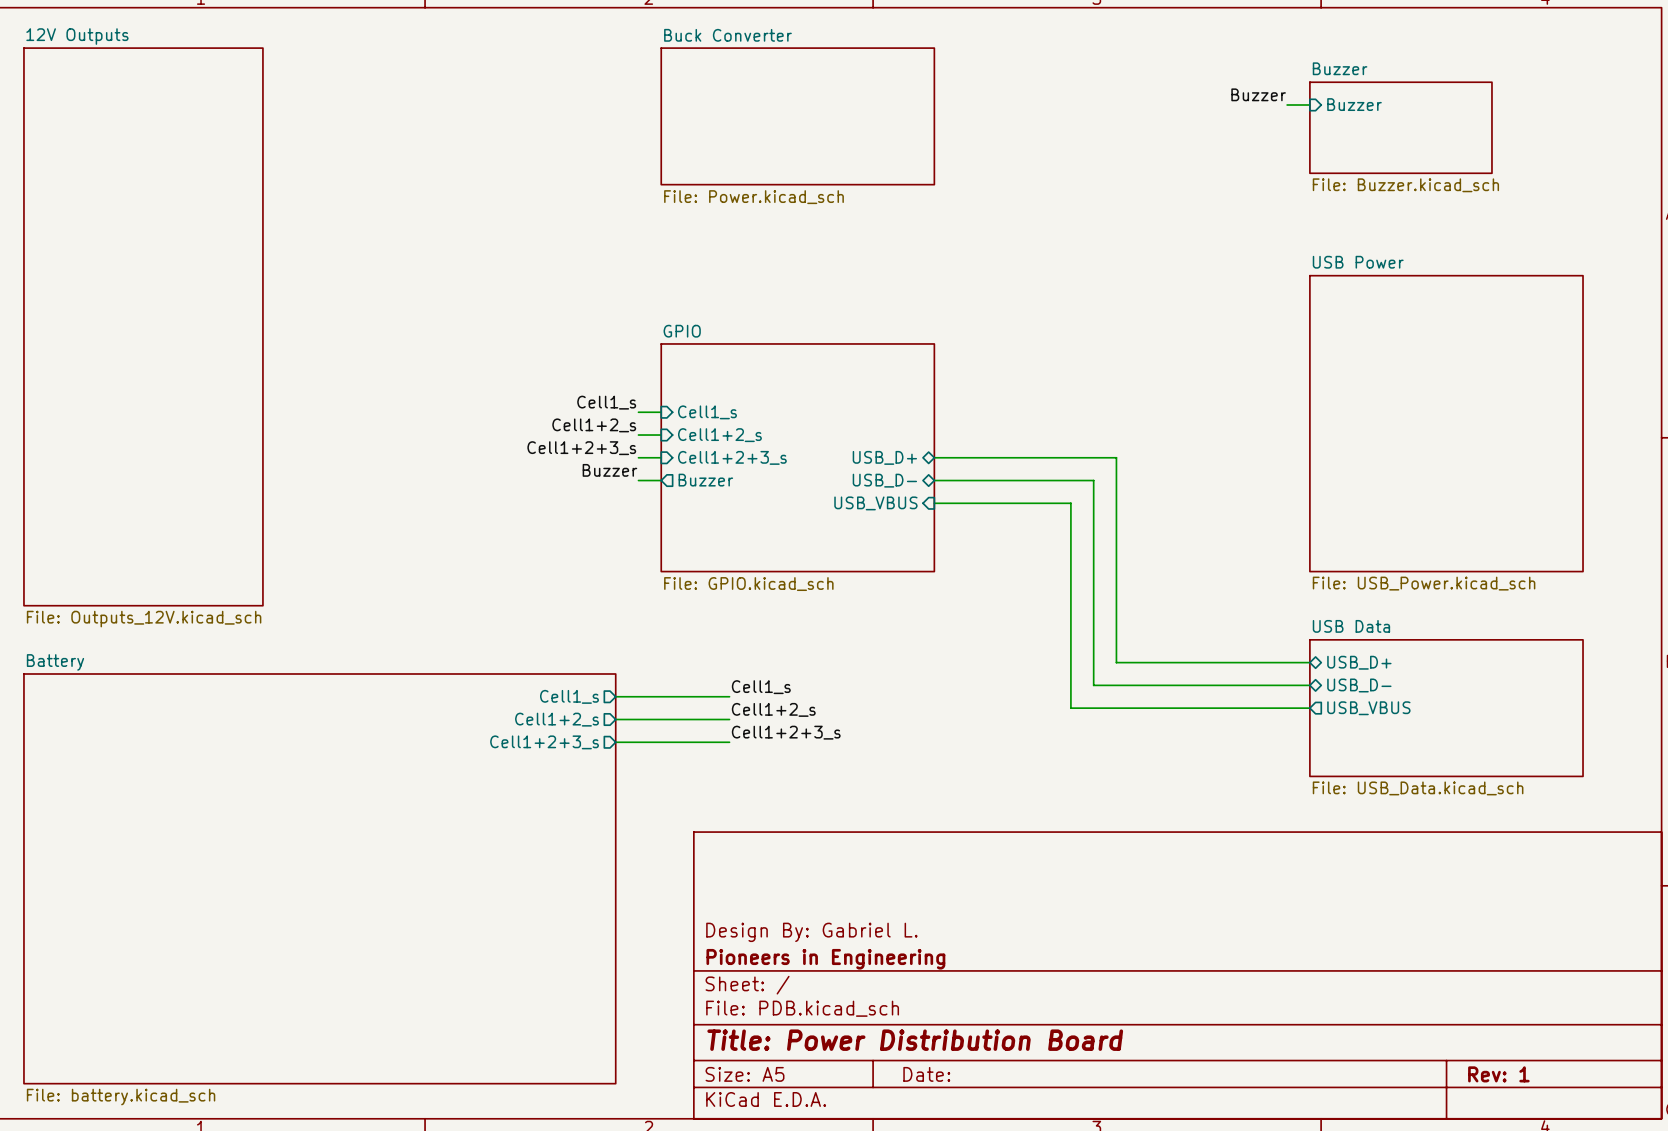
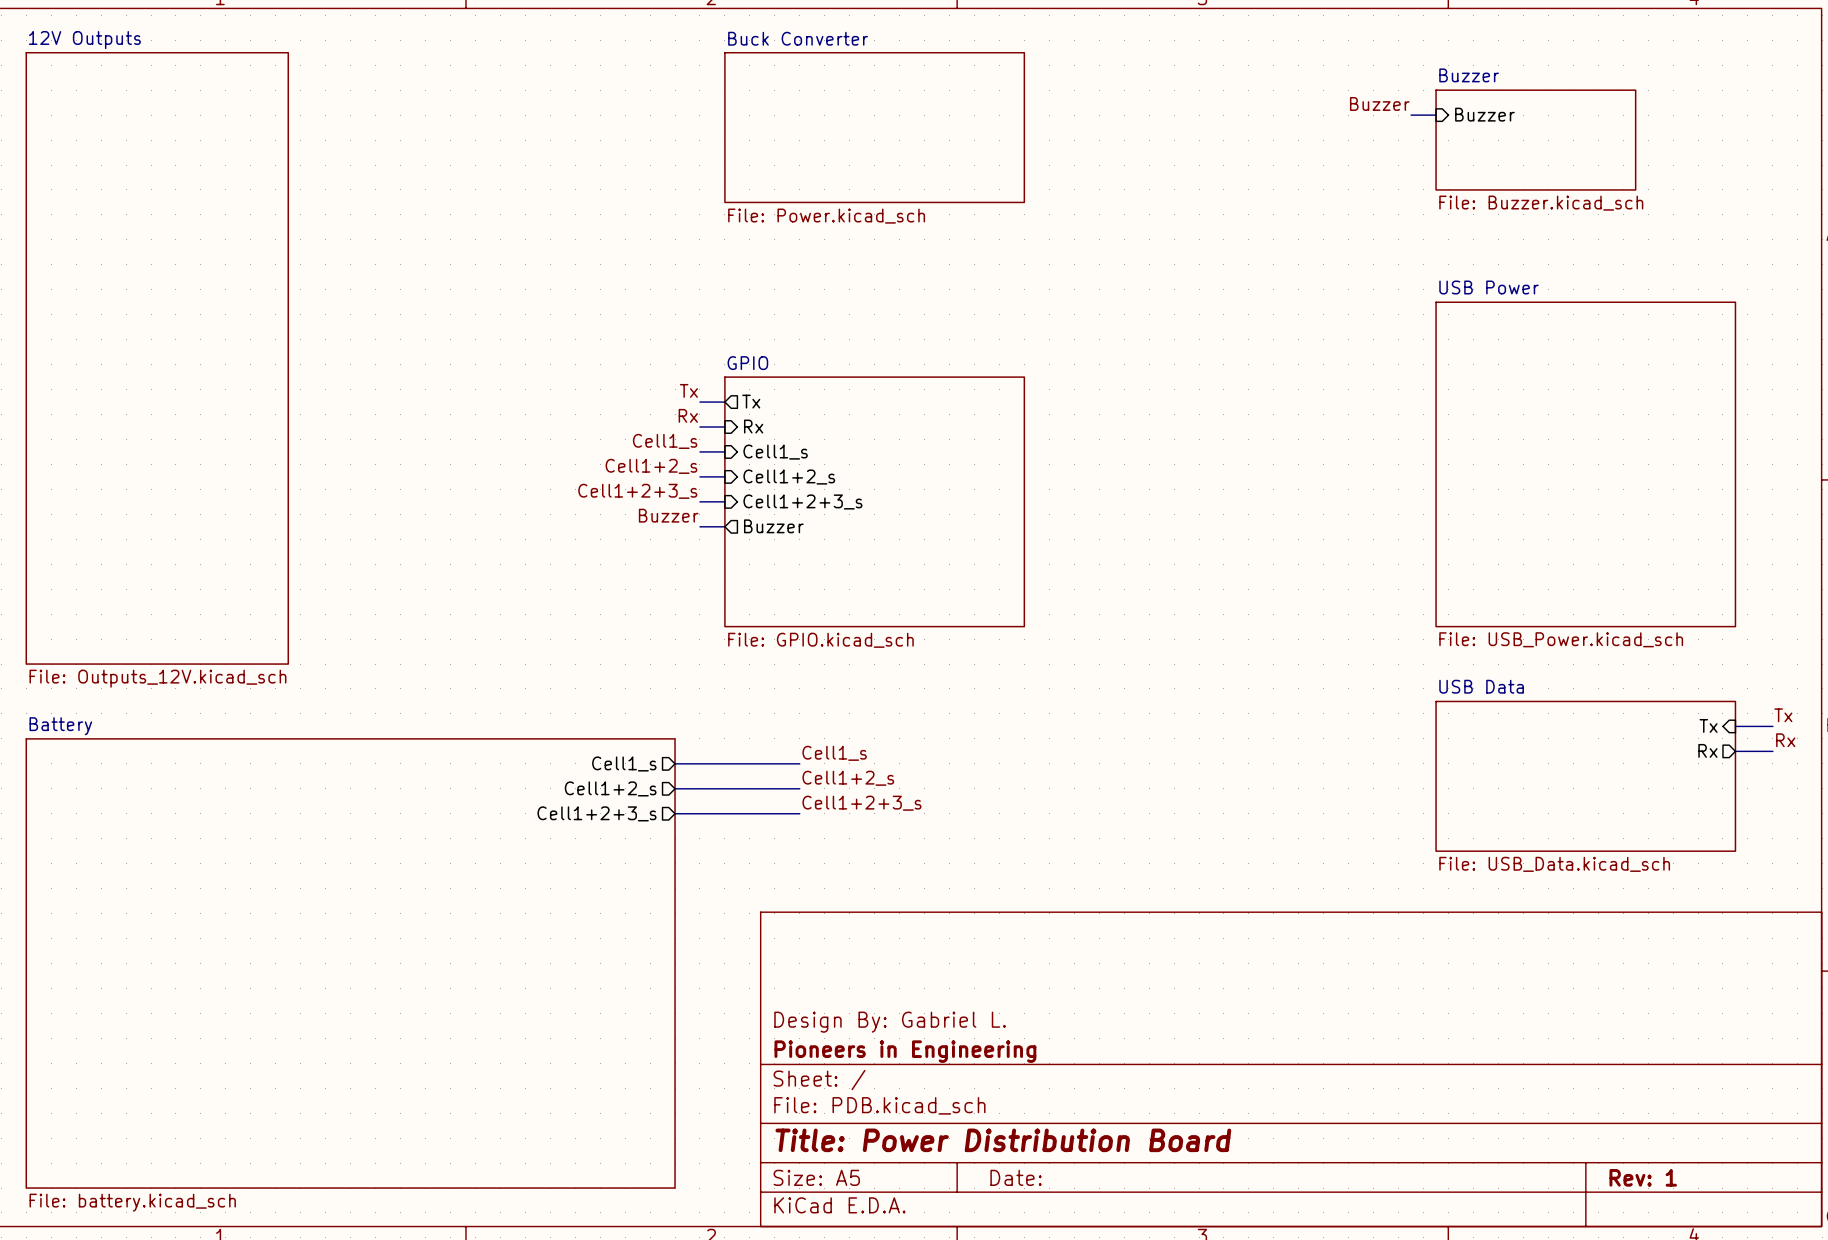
label: none -> Tx (688, 390)
wire: none -> (699, 402) (724, 402)
sheet pin: none -> Tx (751, 401)
label: none -> Rx (688, 415)
wire: none -> (699, 427) (724, 427)
sheet pin: none -> Rx (753, 426)
sheet pin: USB_D+ (884, 457) -> none
wire: (934, 457) (1116, 457) (1116, 662) (1309, 662) -> none
sheet pin: USB_D- (884, 480) -> none
wire: (934, 480) (1093, 480) (1093, 685) (1309, 685) -> none
sheet pin: USB_VBUS (875, 503) -> none
wire: (934, 503) (1070, 503) (1070, 708) (1309, 708) -> none
label: none -> Tx (1783, 715)
sheet pin: USB_D+ (1359, 662) -> none
sheet pin: none -> Tx (1708, 725)
wire: none -> (1735, 726) (1772, 726)
label: none -> Rx (1785, 740)
sheet pin: none -> Rx (1707, 750)
sheet pin: USB_D- (1359, 685) -> none
wire: none -> (1735, 751) (1772, 751)
sheet pin: USB_VBUS (1368, 708) -> none

